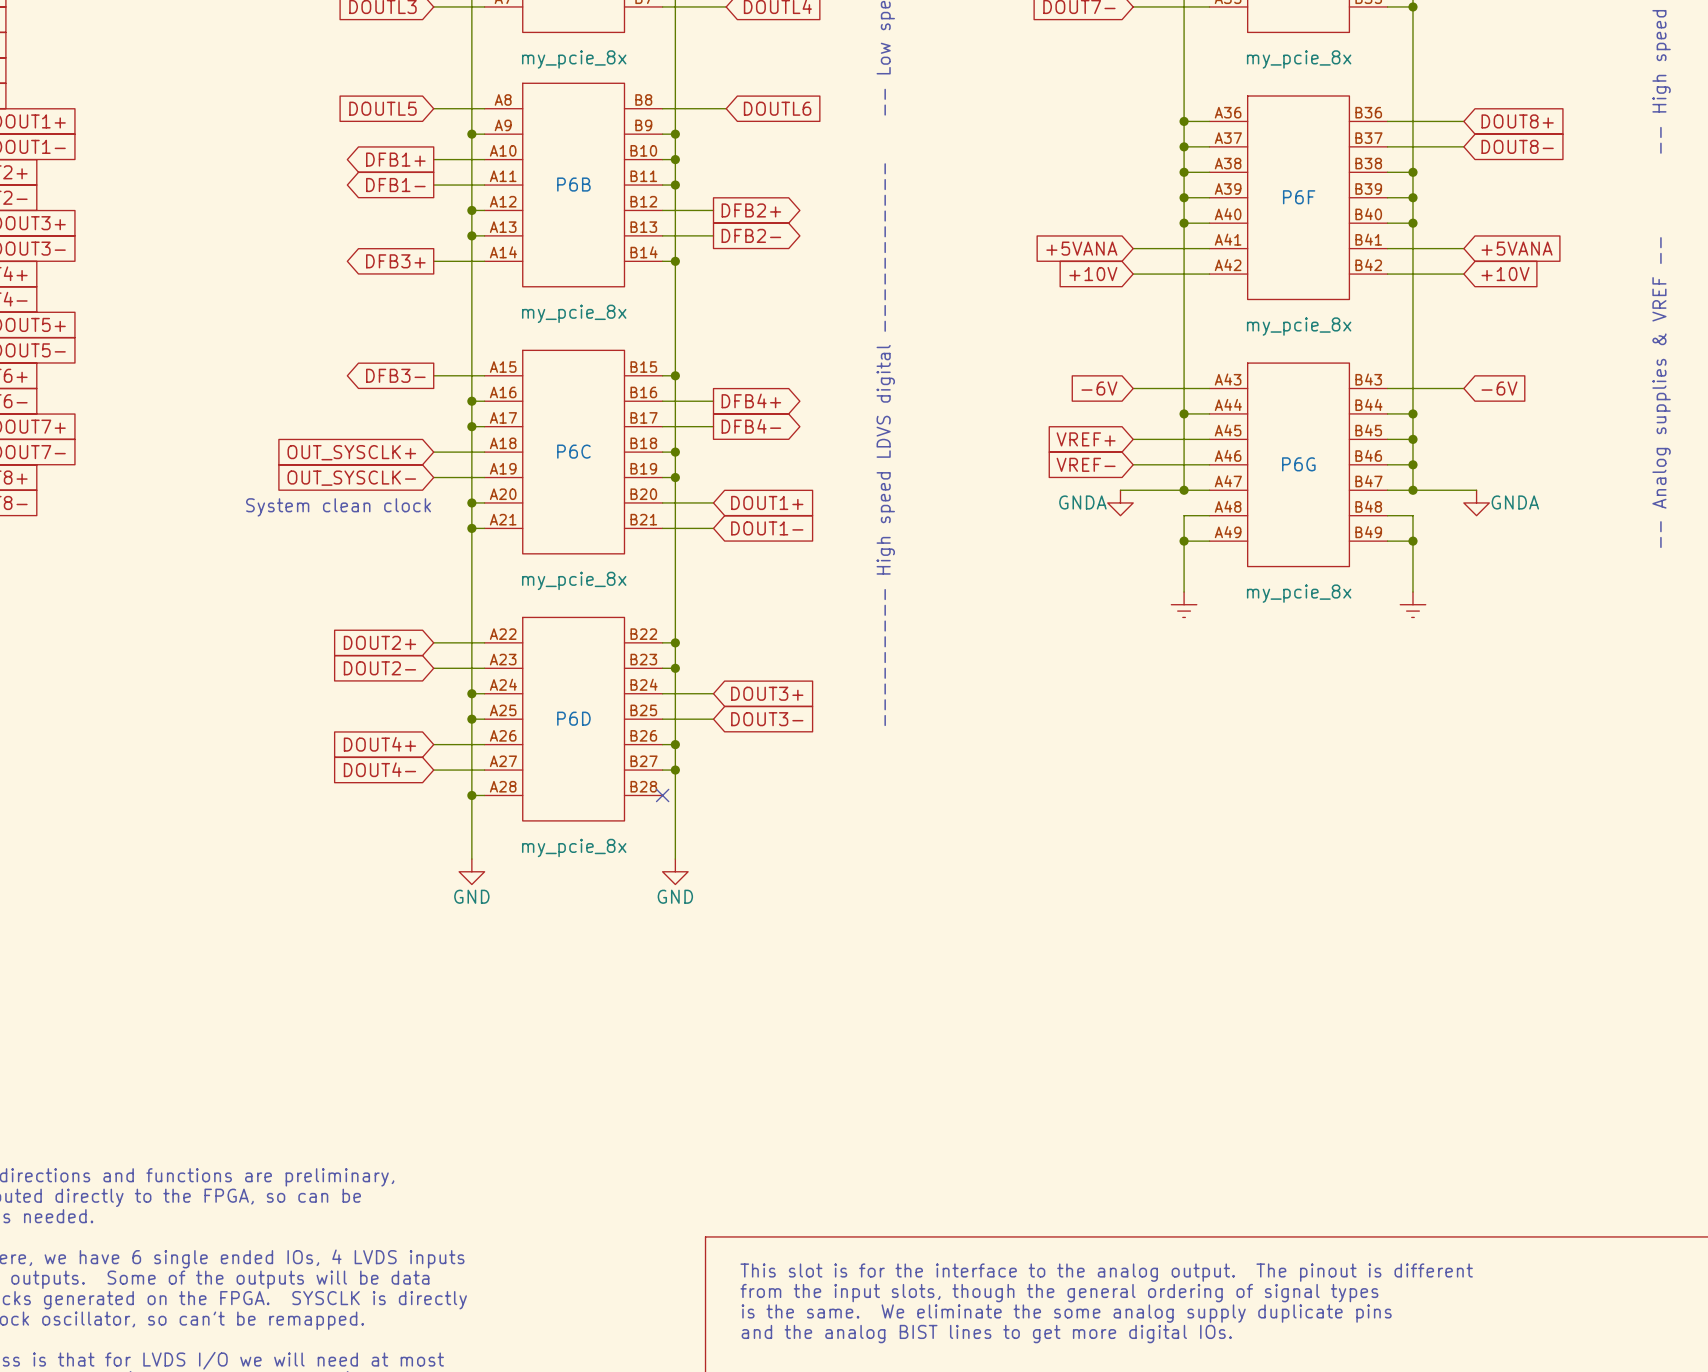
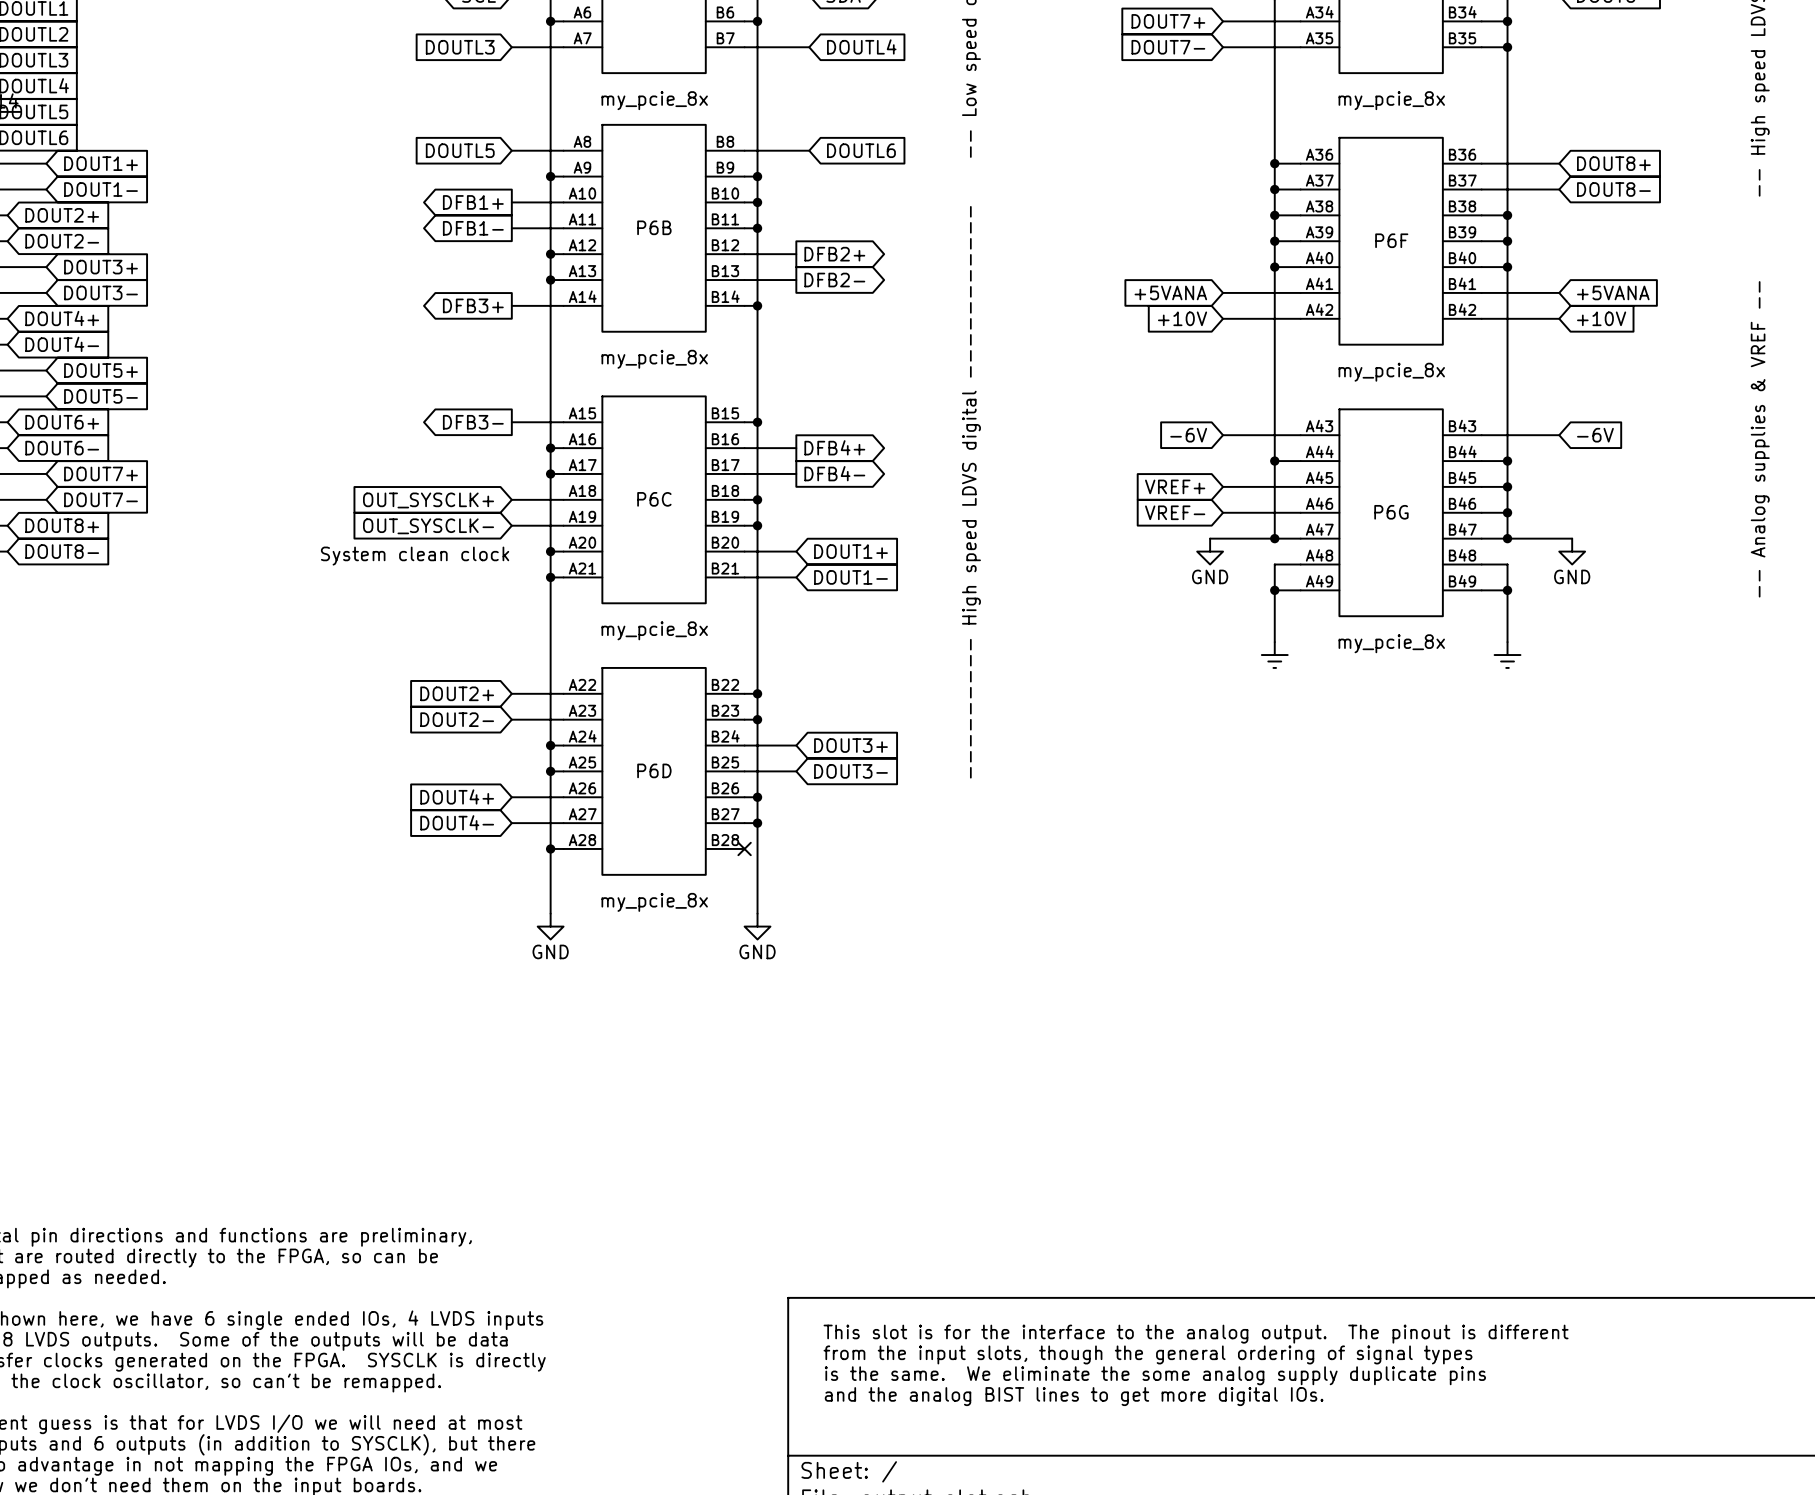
power symbol: GNDA (1120, 502) -> GND (1210, 551)
power symbol: GNDA (1476, 502) -> GND (1572, 551)

